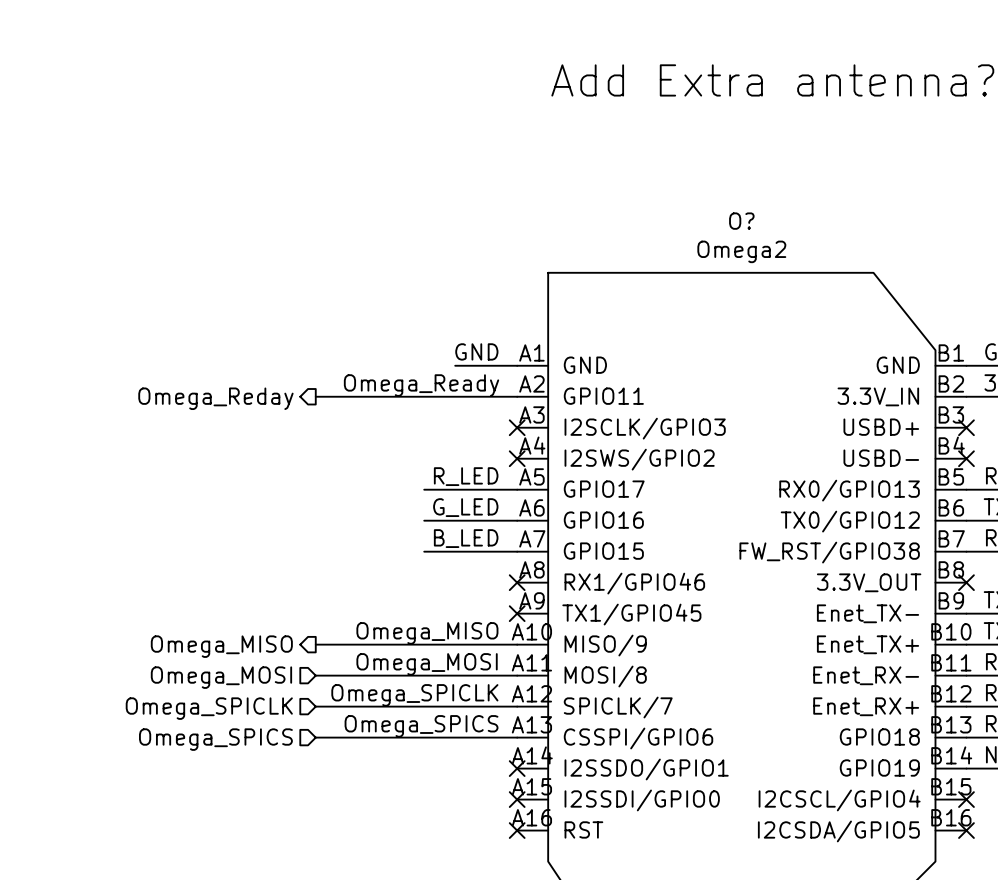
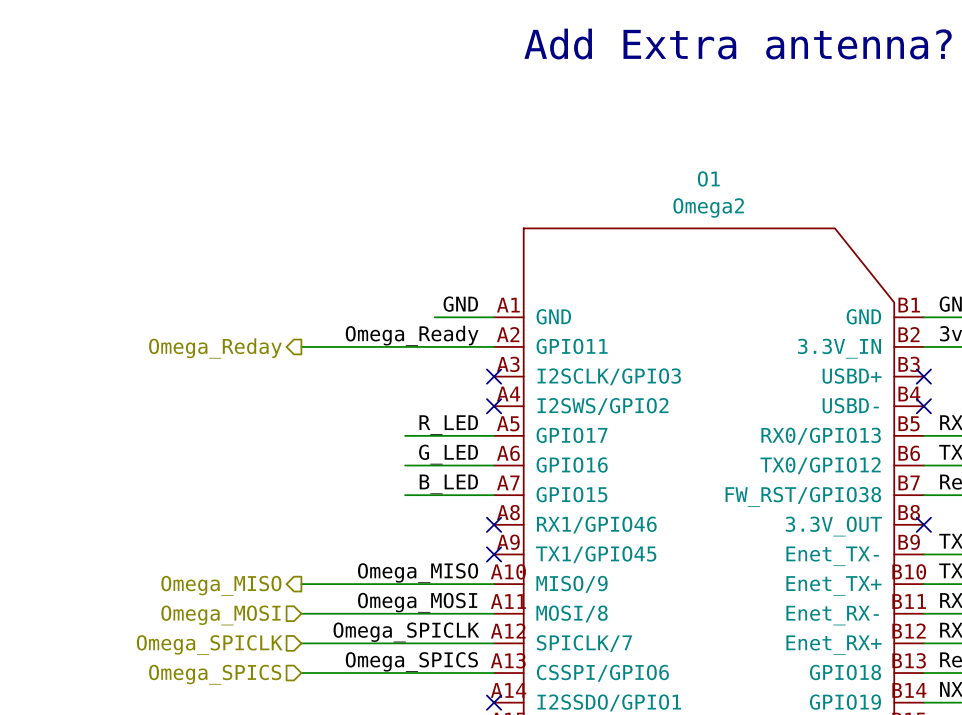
O? name: O? (741, 221) -> O1 (708, 178)

